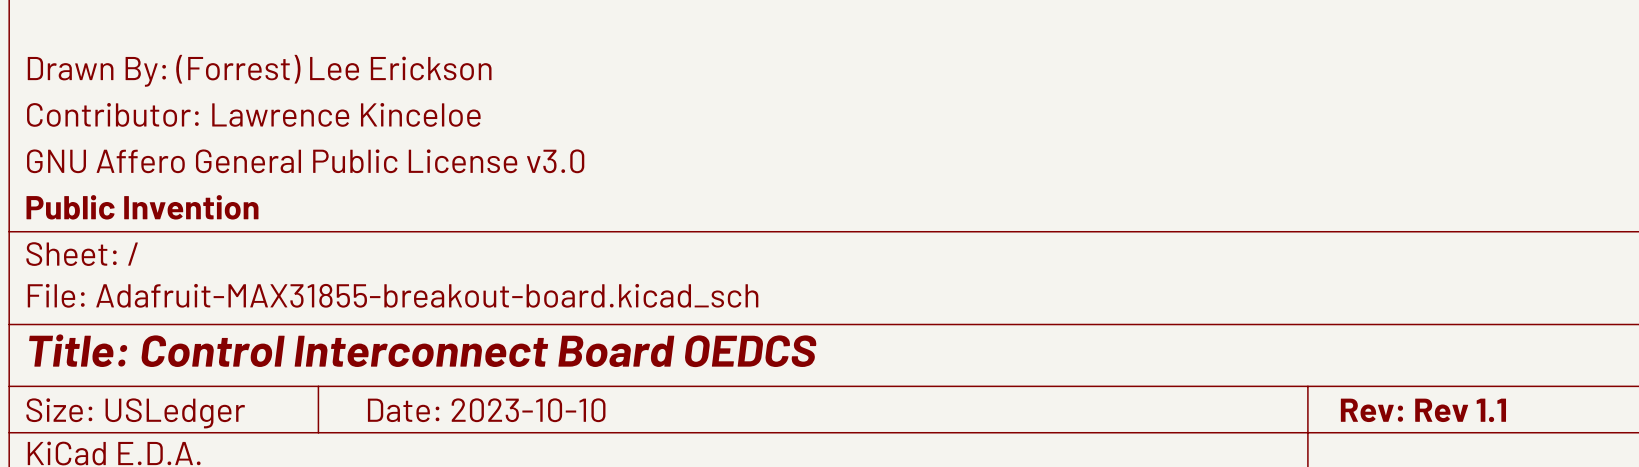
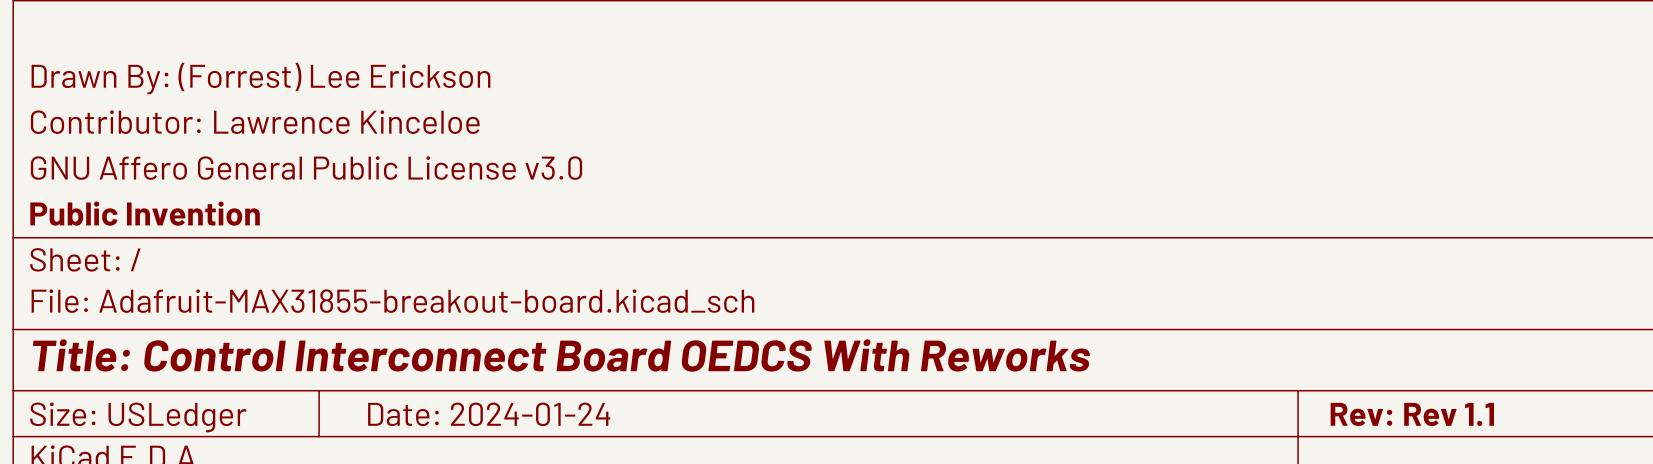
title block: Title: Control Interconnect Board OEDCS (422, 350) -> Title: Control Interconnect Board OEDCS With Reworks (561, 355)
title block: Date: 2023-10-10 (486, 410) -> Date: 2024-01-24 (489, 414)

